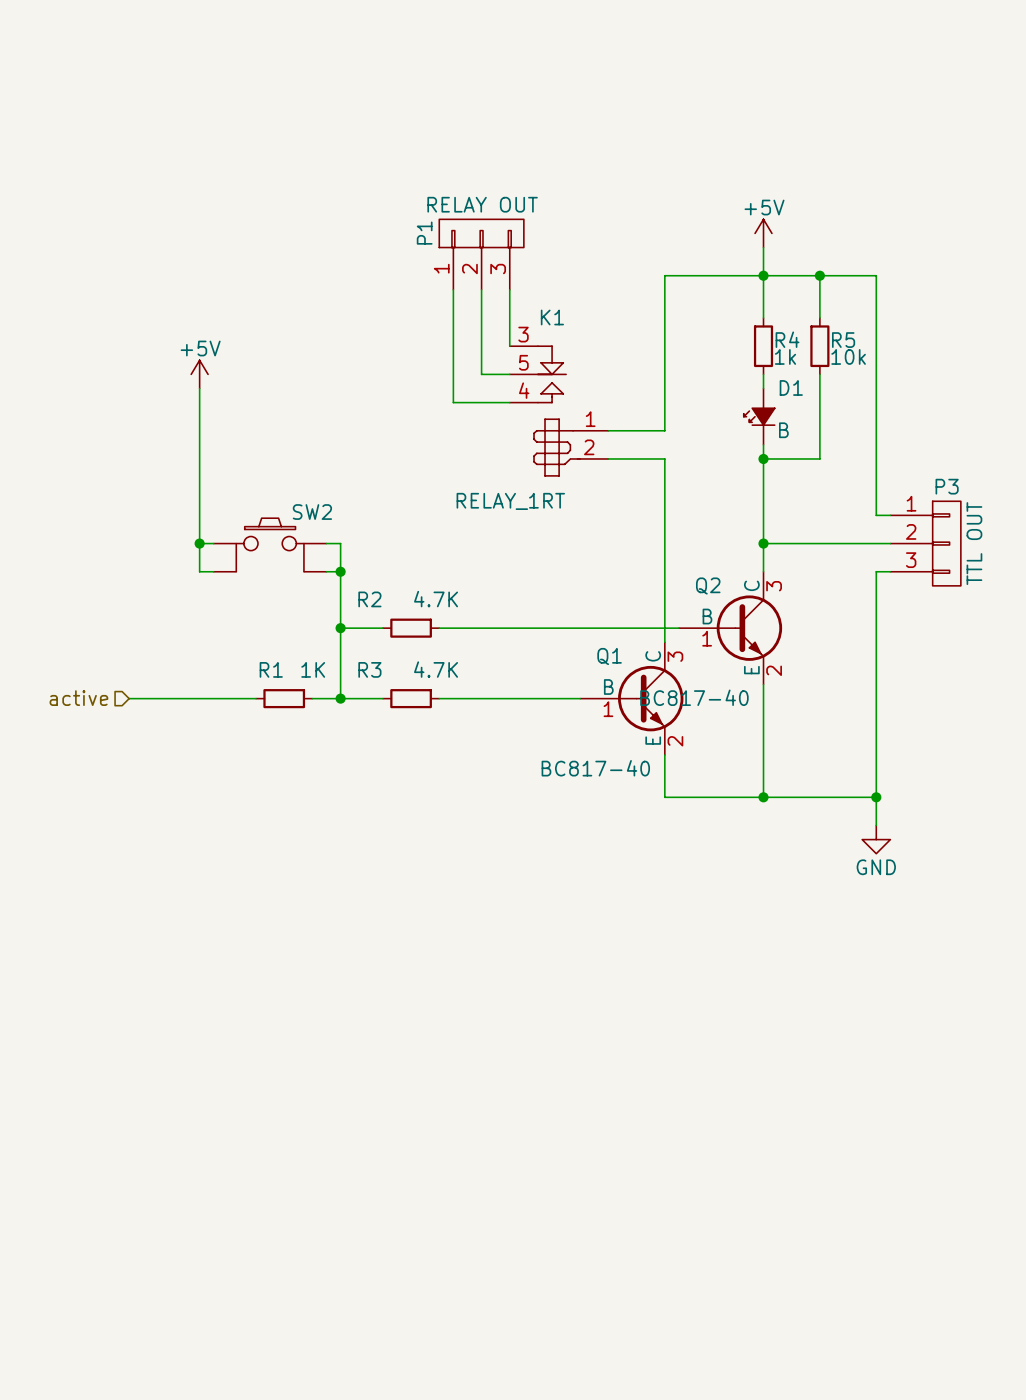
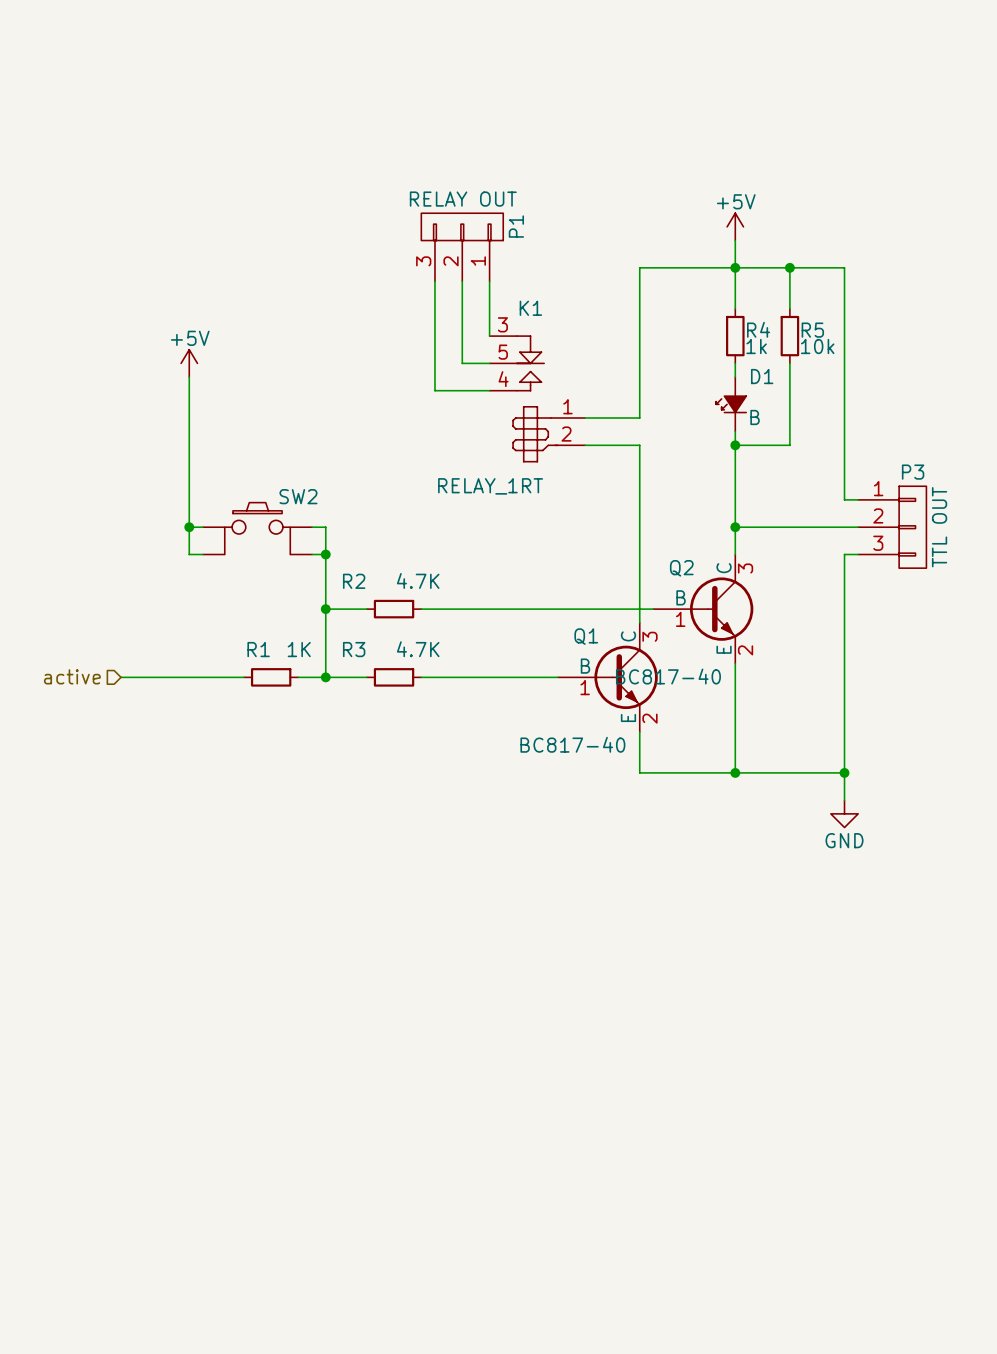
P1 flip: as is (481, 233) -> left-right (462, 226)

